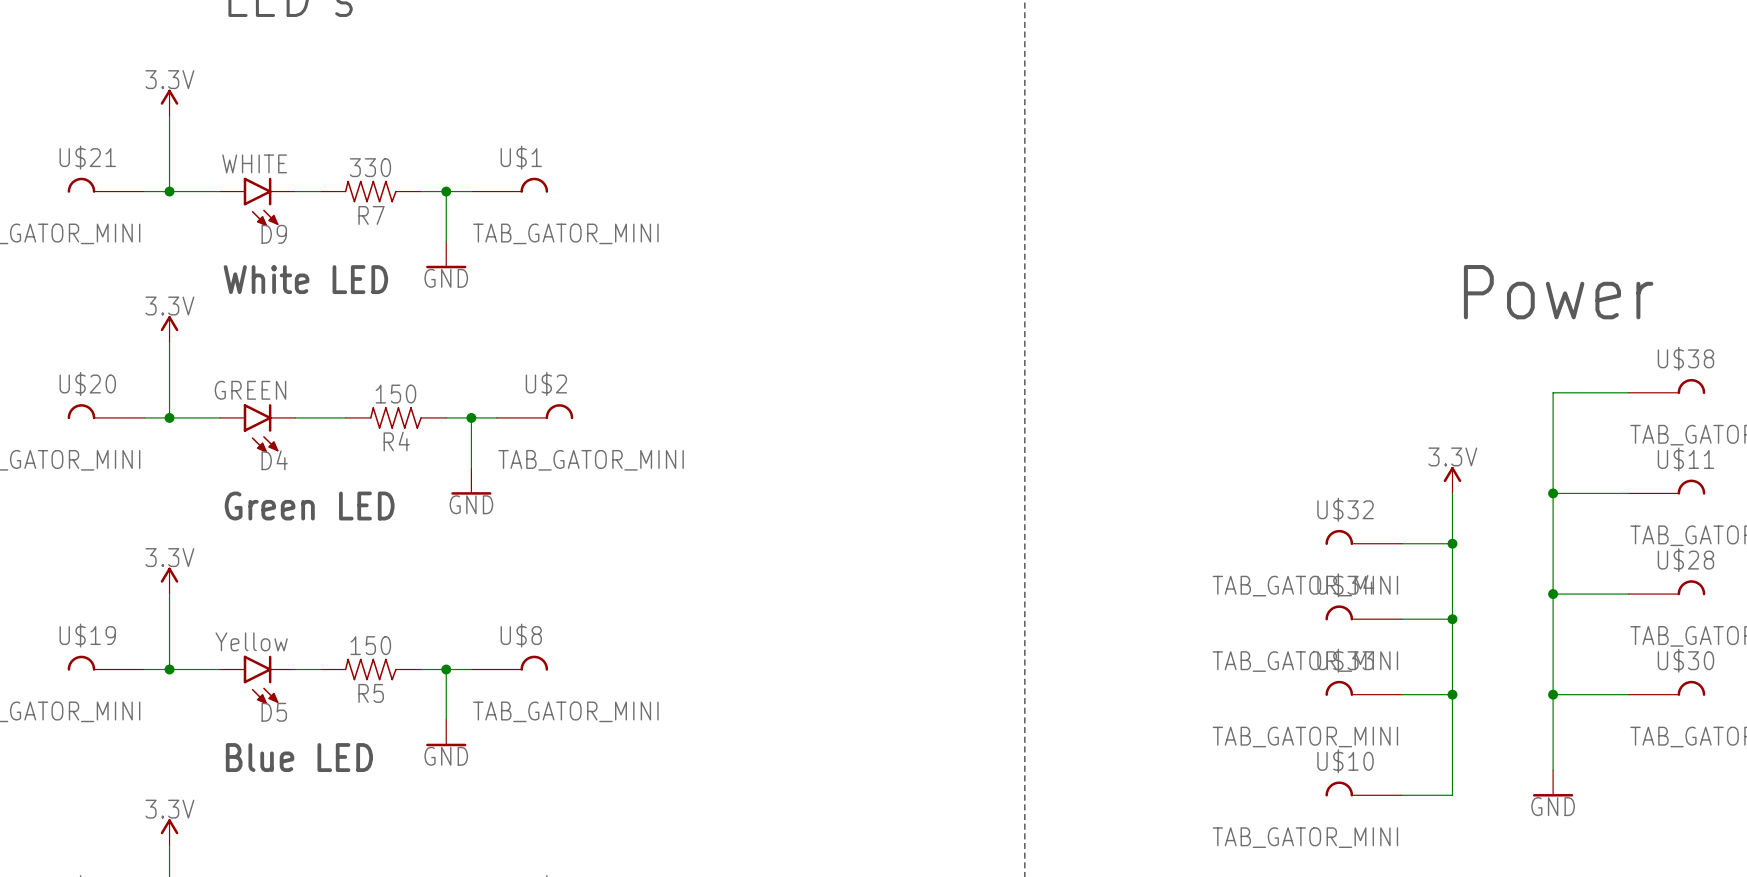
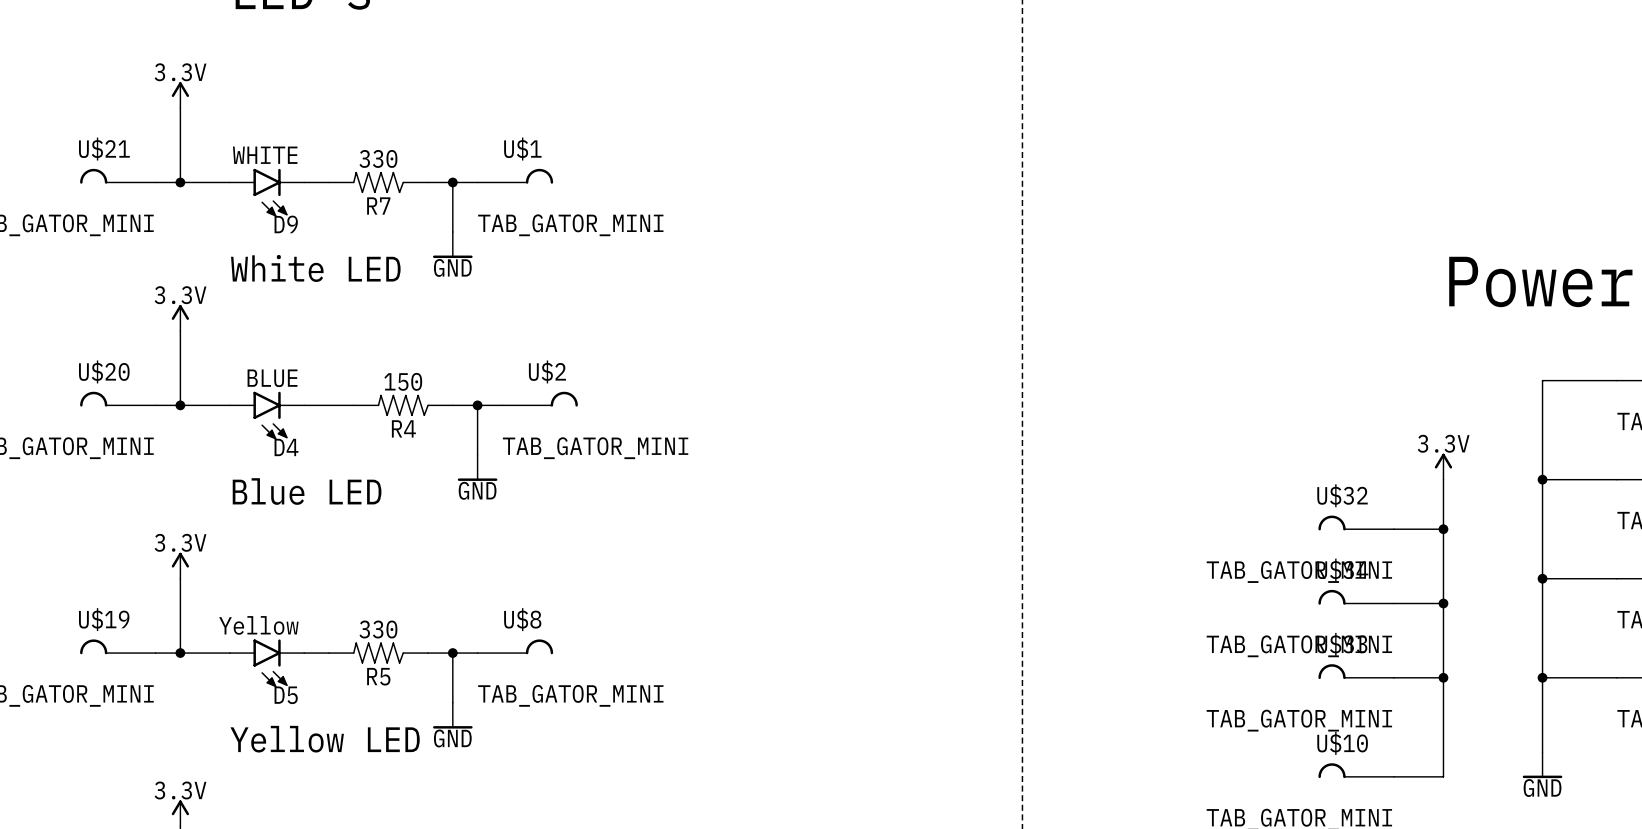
D4 value: GREEN (250, 390) -> BLUE (272, 378)
text: Green LED (309, 506) -> Blue LED (307, 491)
R5 value: 150 (370, 645) -> 330 (378, 629)
text: Blue LED (299, 757) -> Yellow LED (325, 739)

